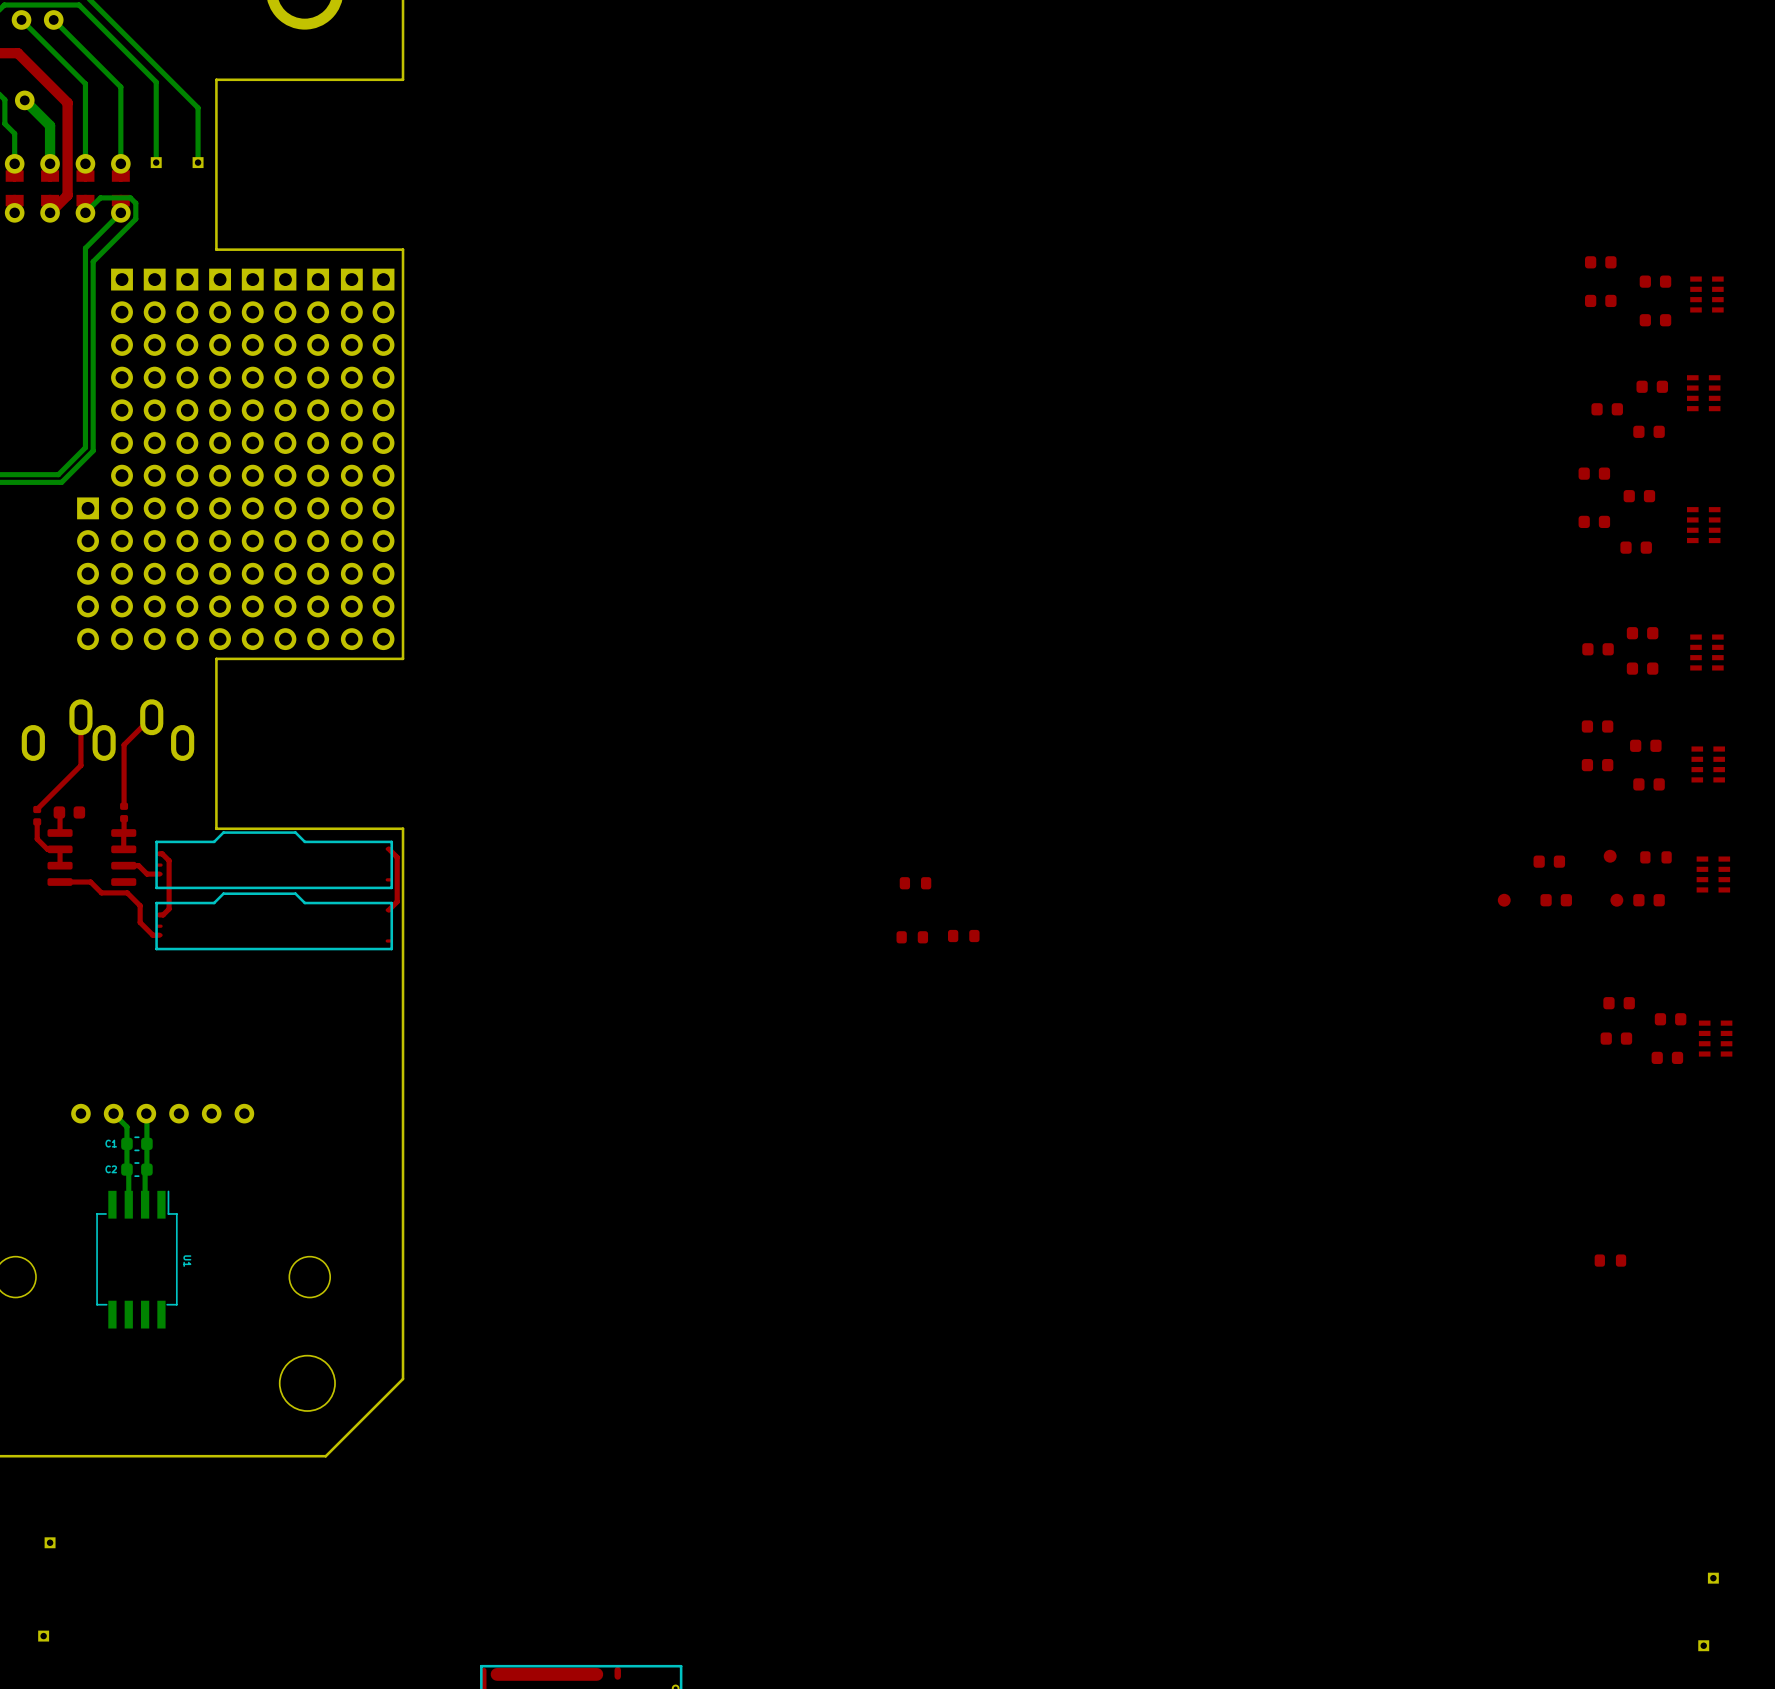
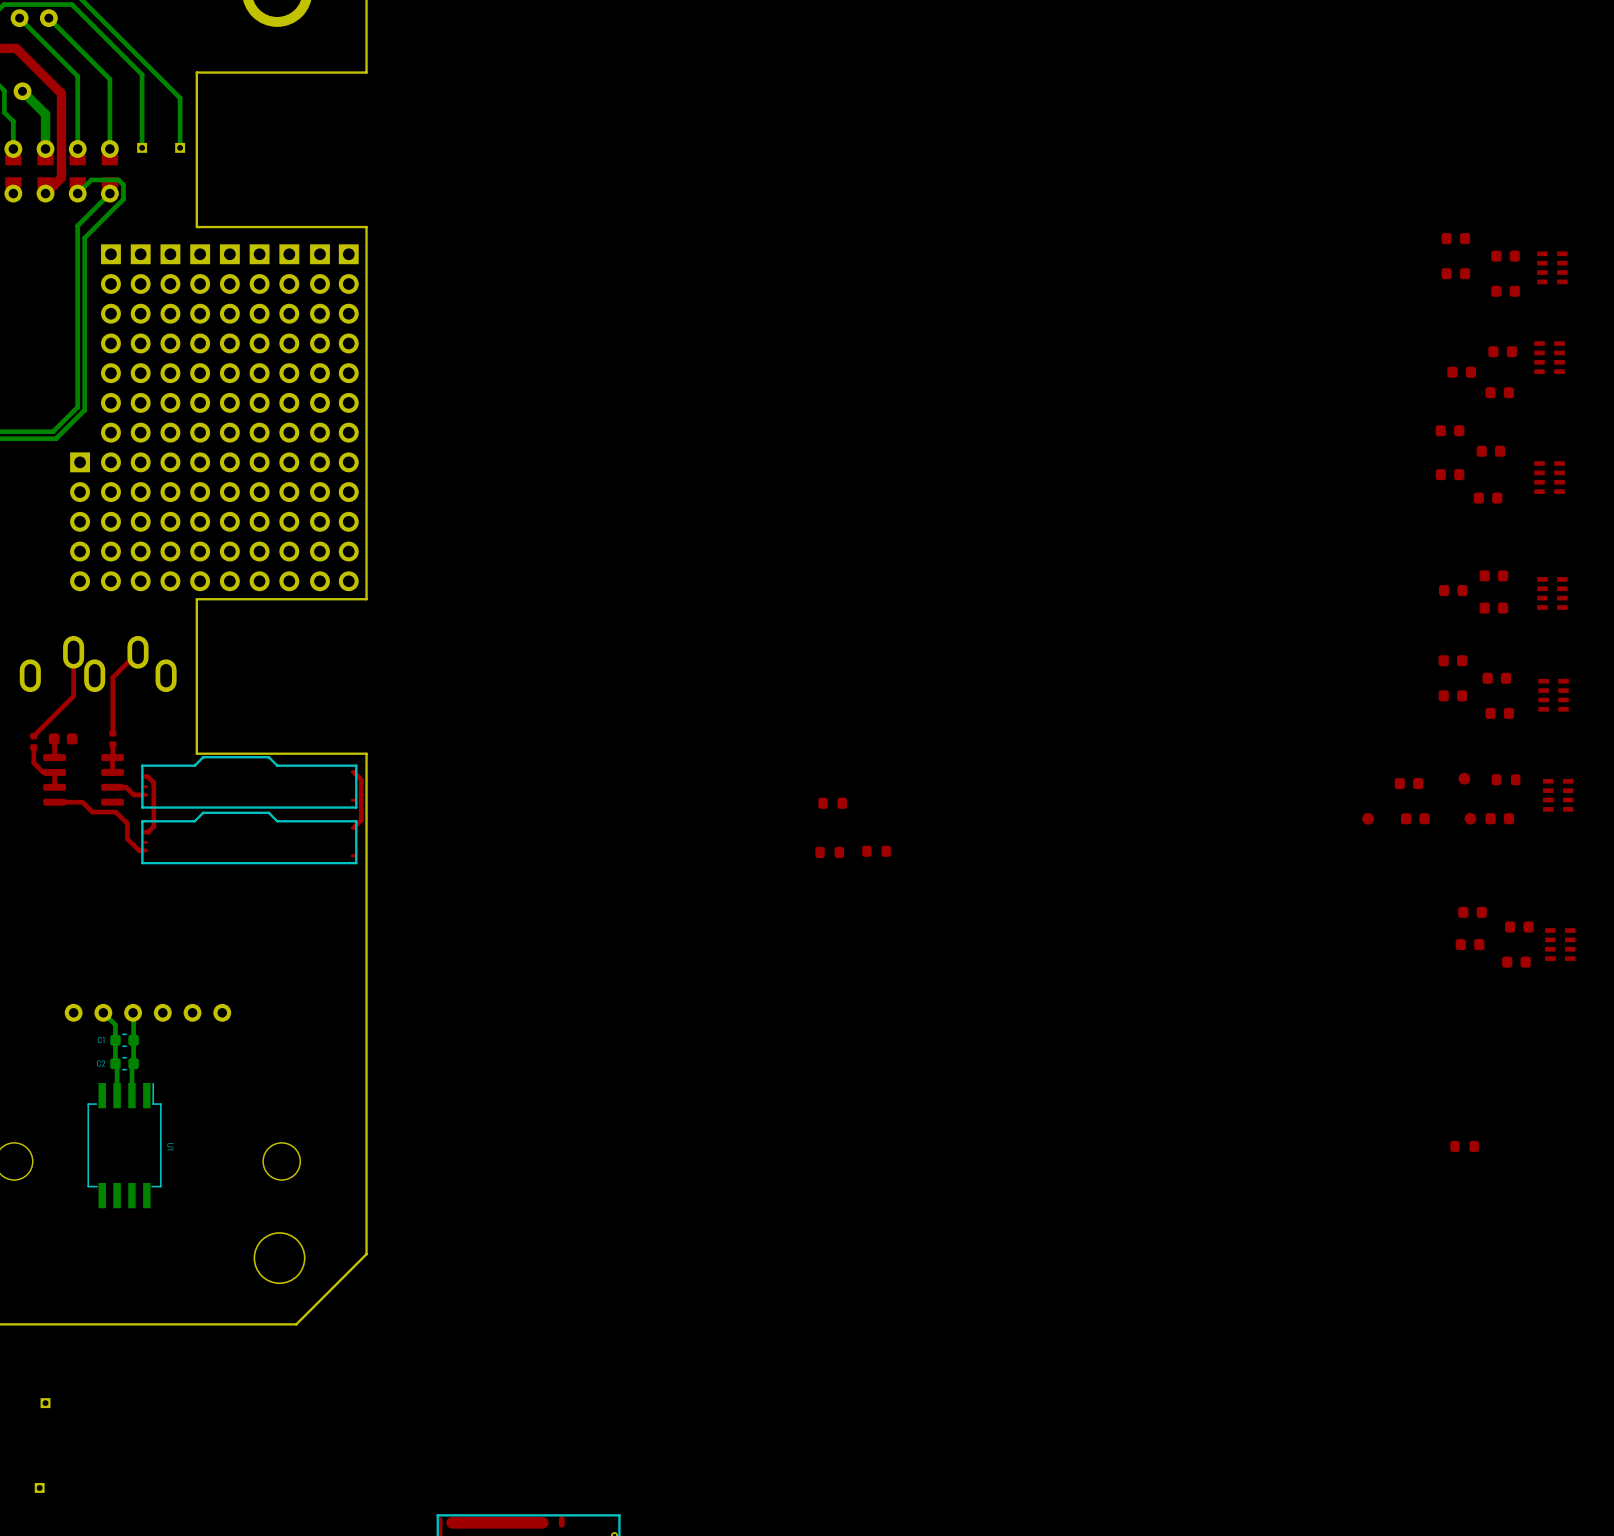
part: (1713, 1578) -> none
part: (1703, 1645) -> none

